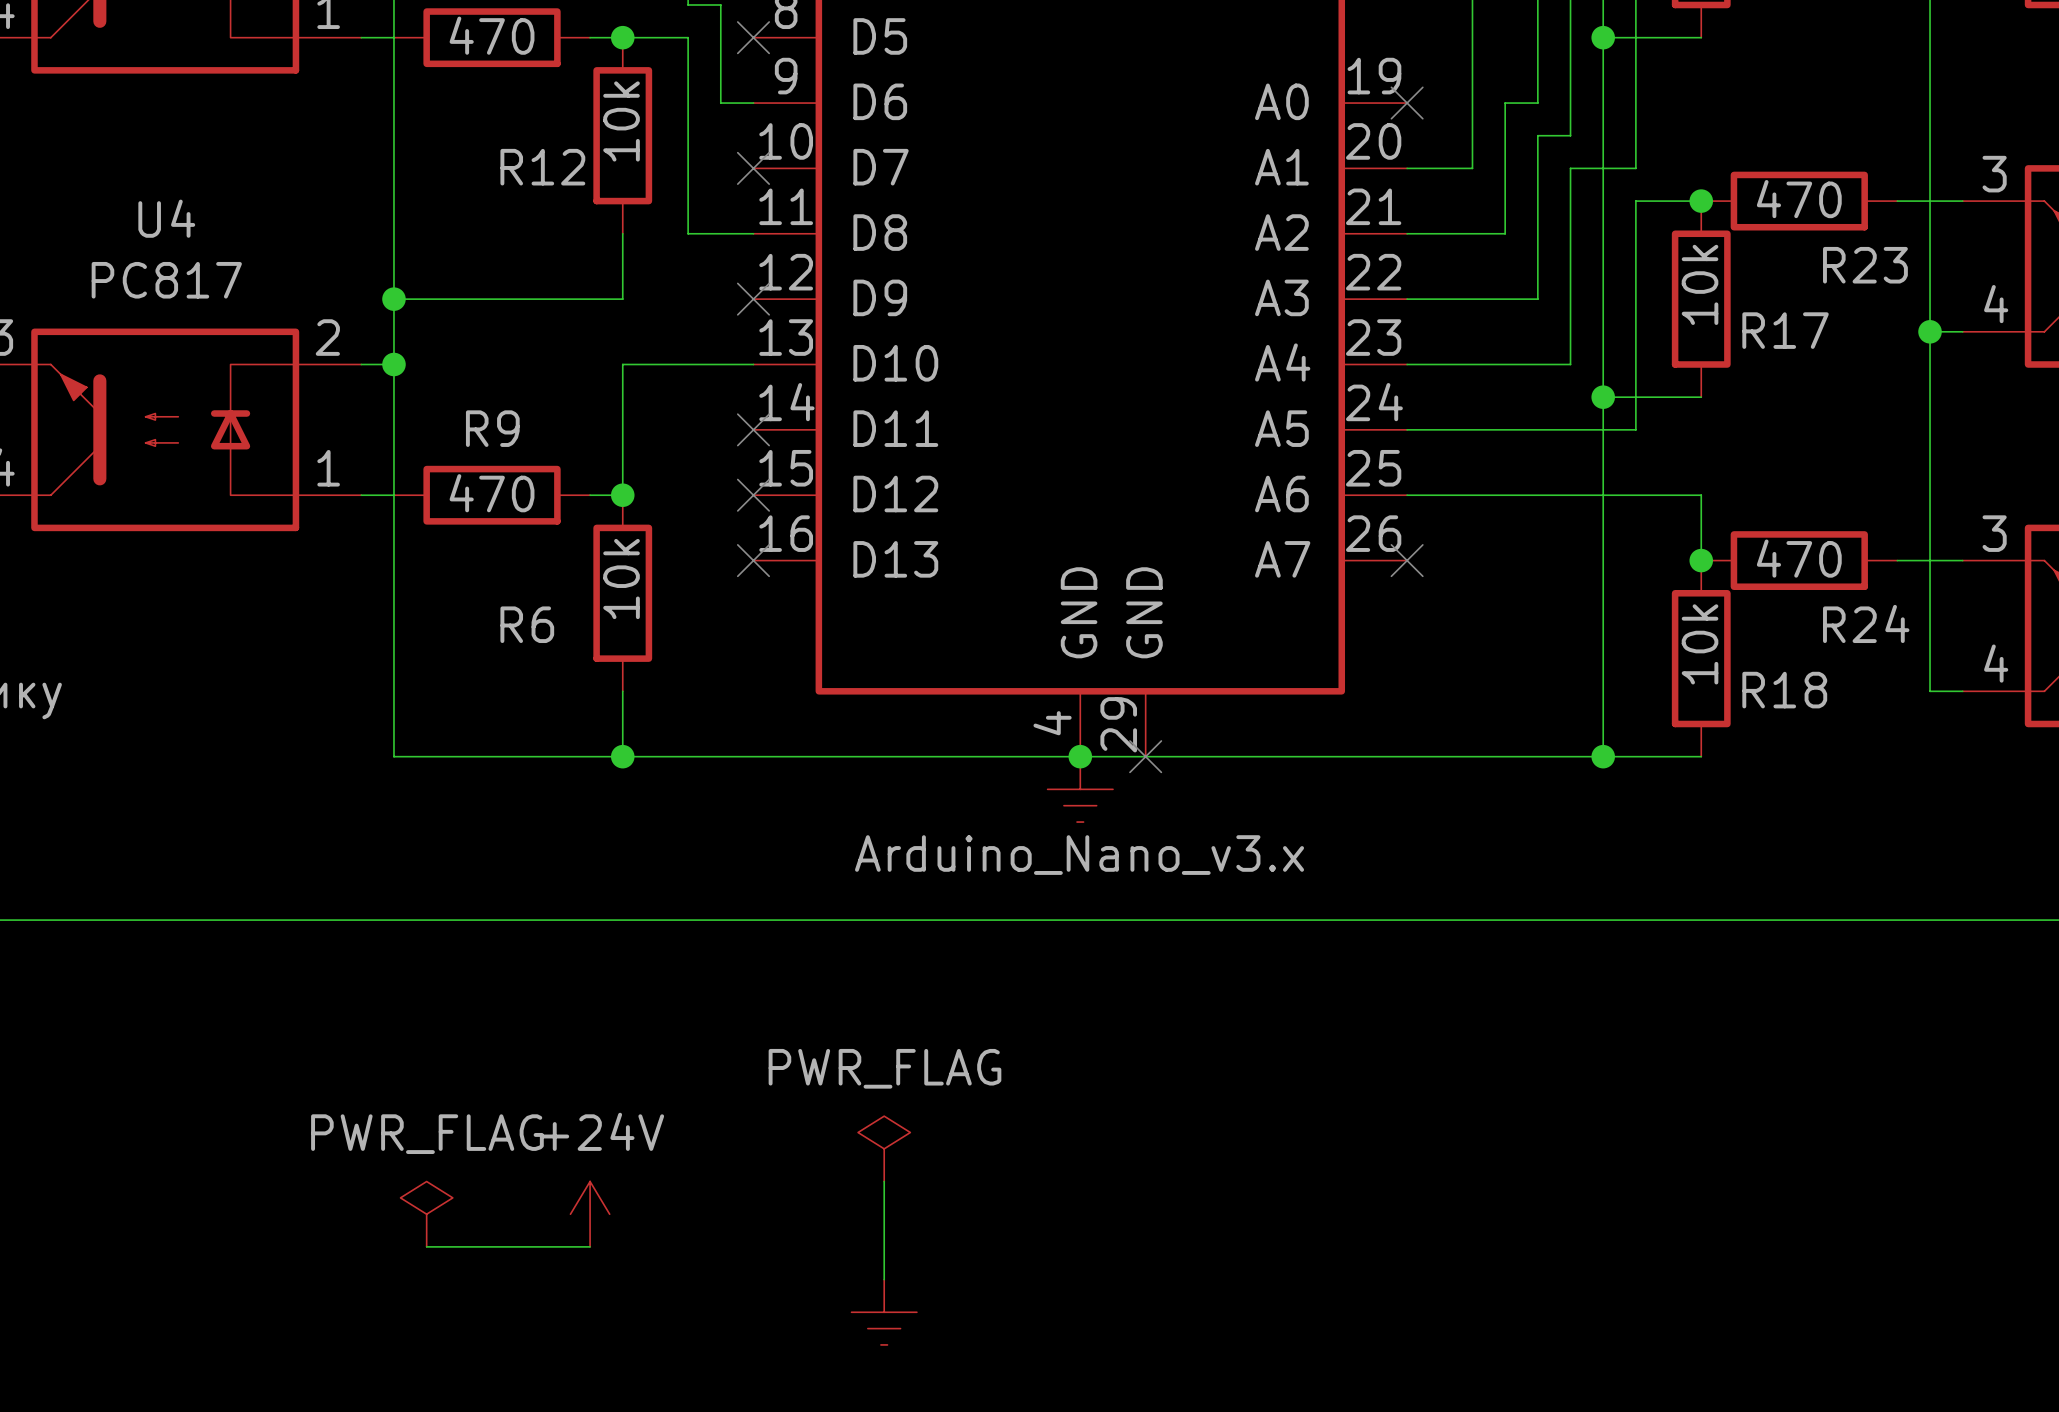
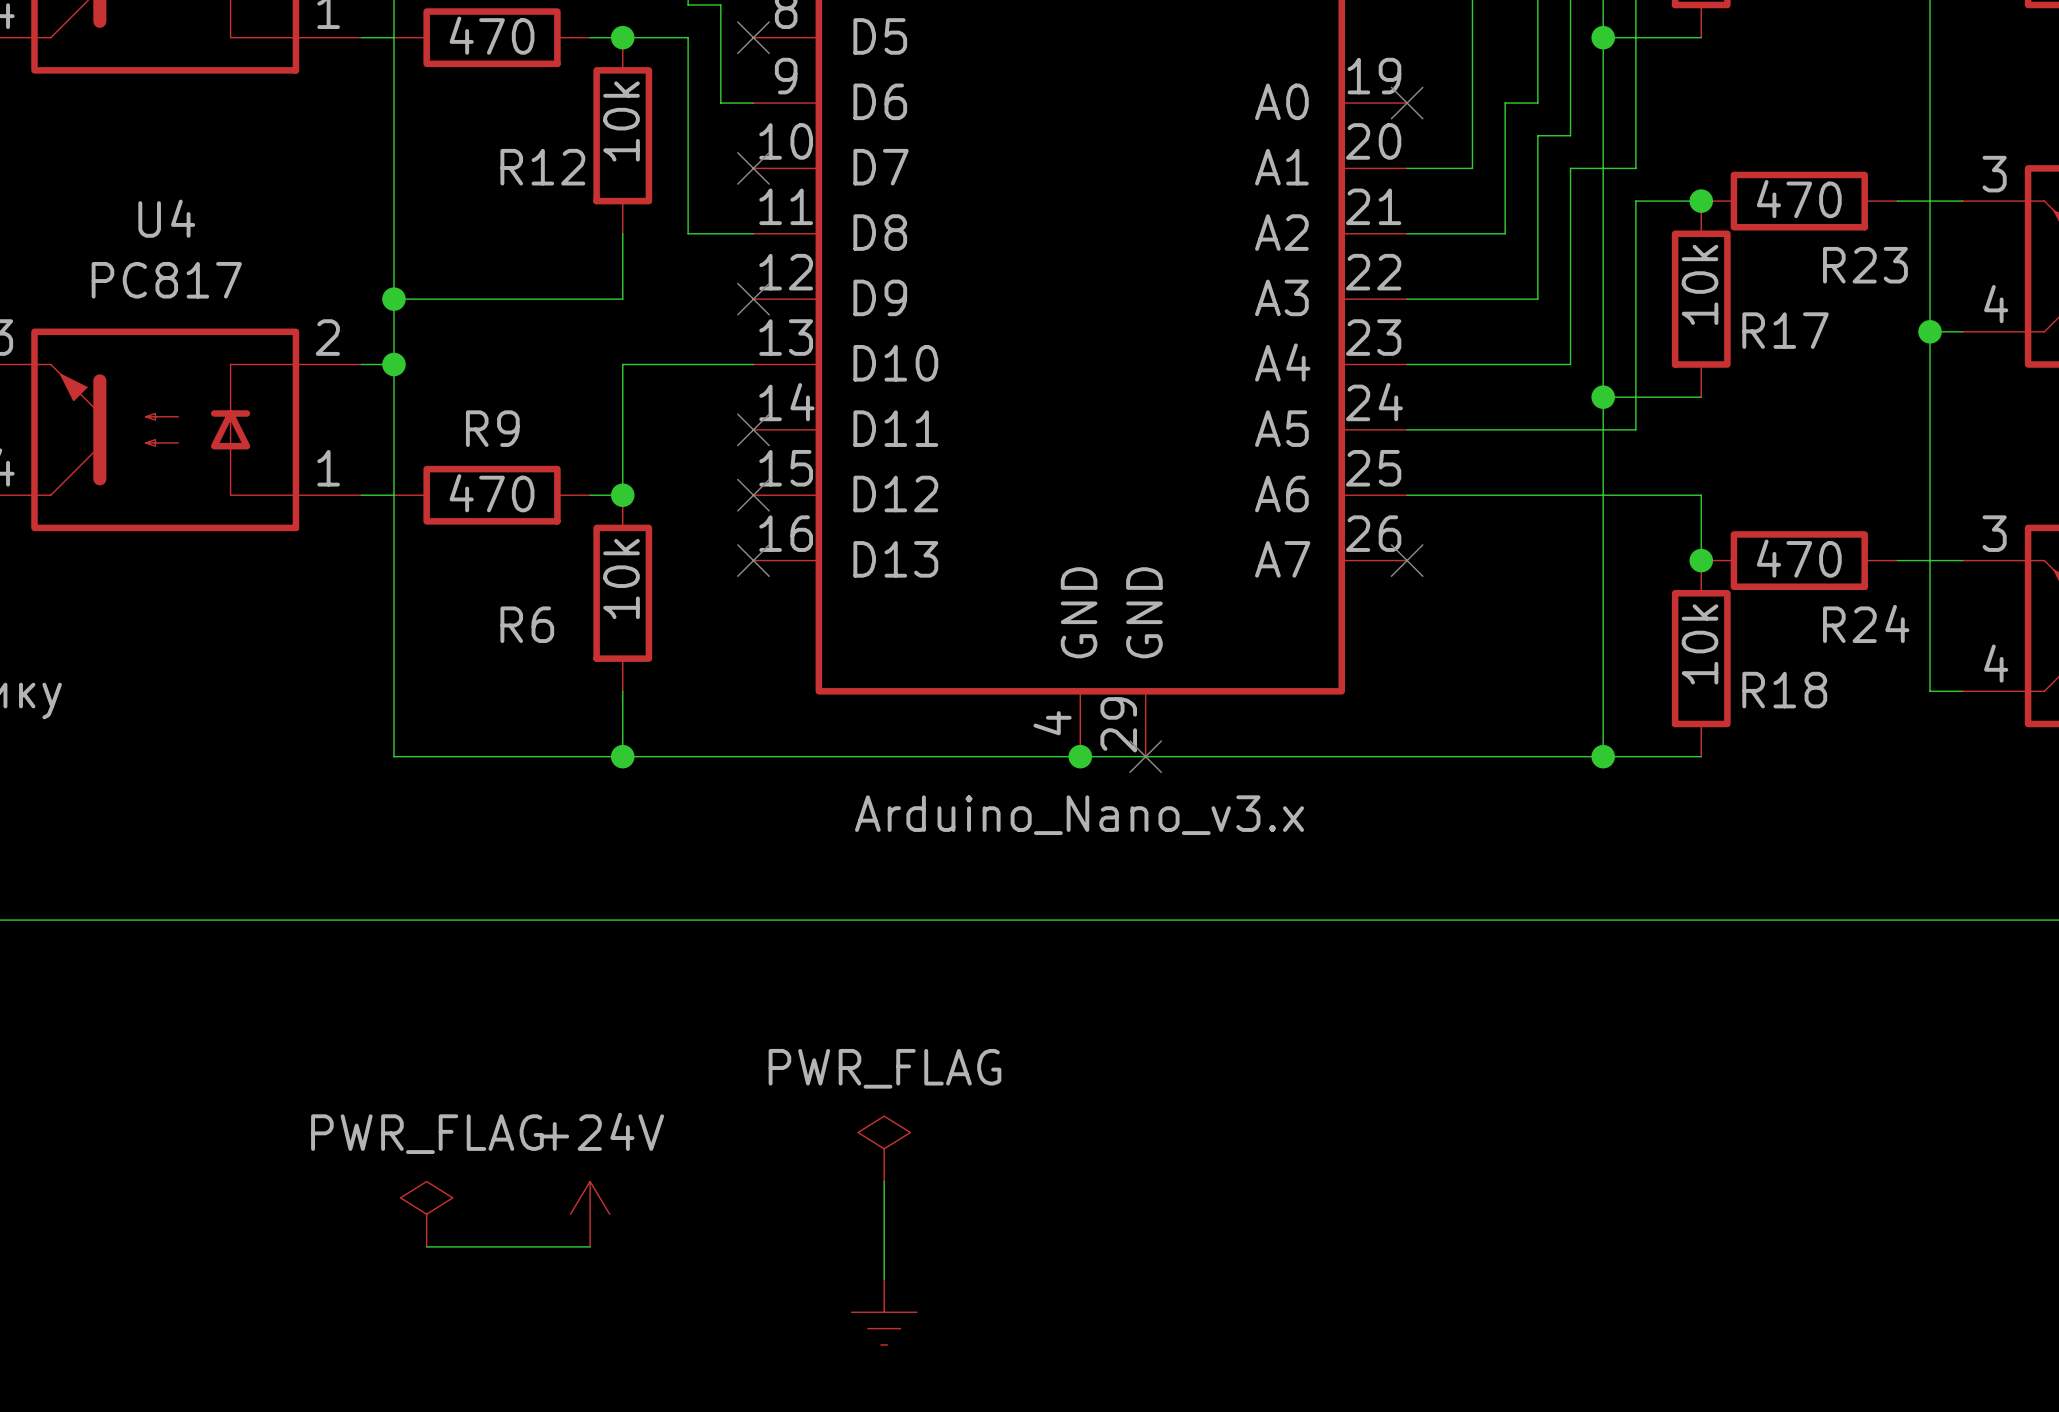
power symbol: (1080, 789) -> none
part value position: Arduino_Nano_v3.x (1079, 855) -> Arduino_Nano_v3.x (1079, 815)

